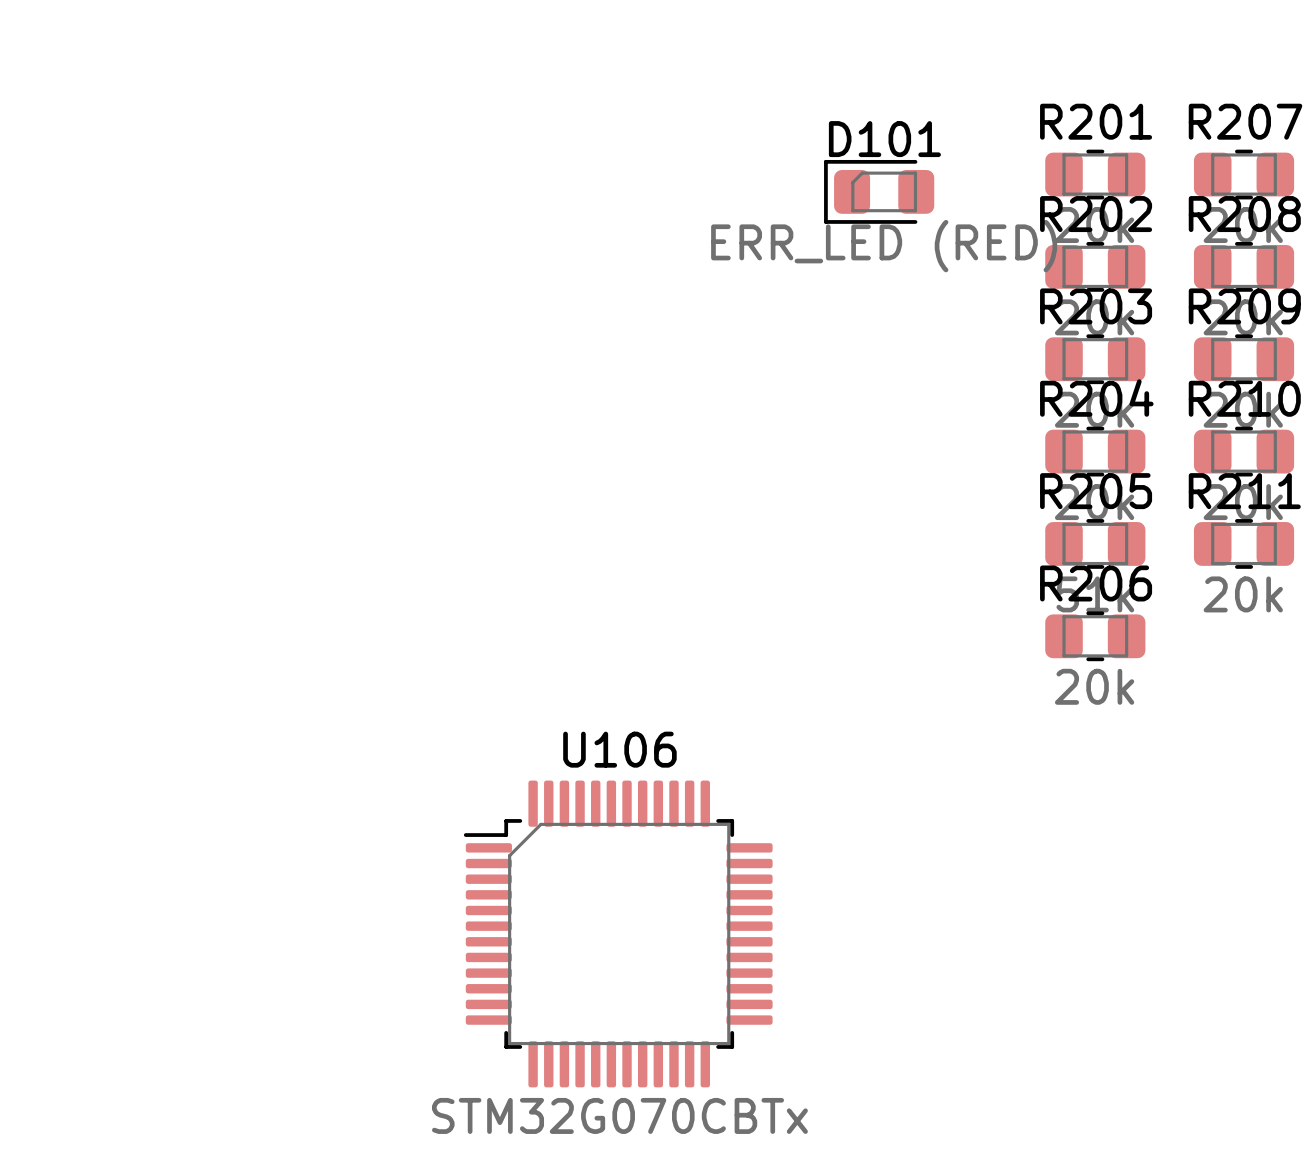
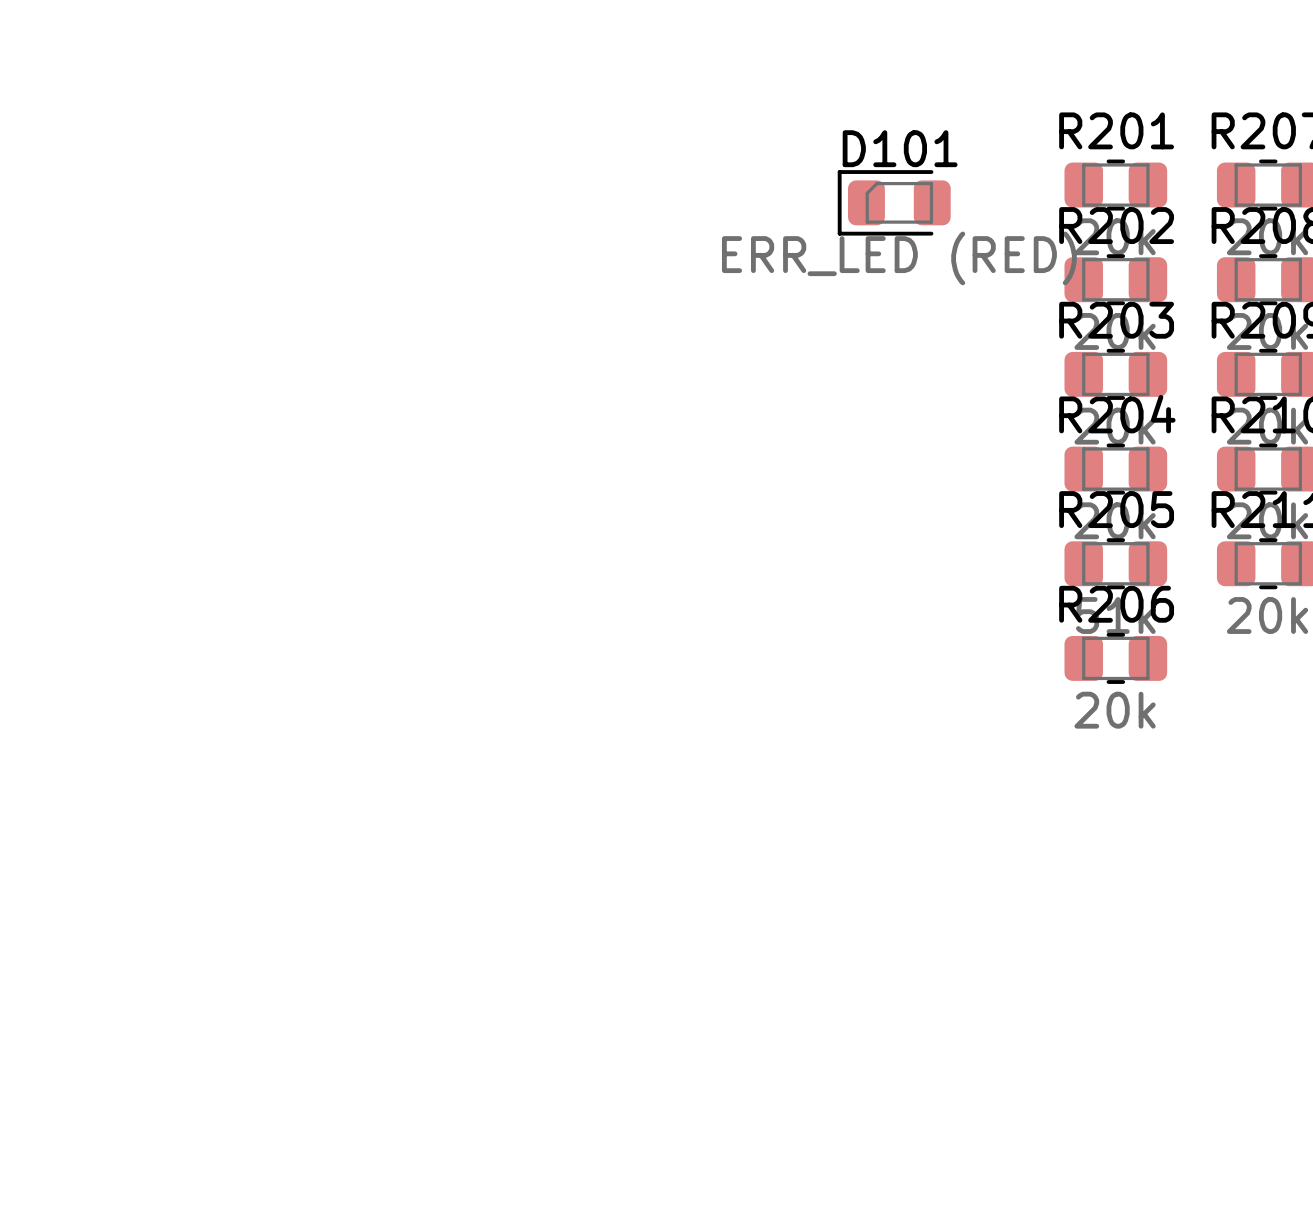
U106: STM32G070CBTx (618, 933) -> none

